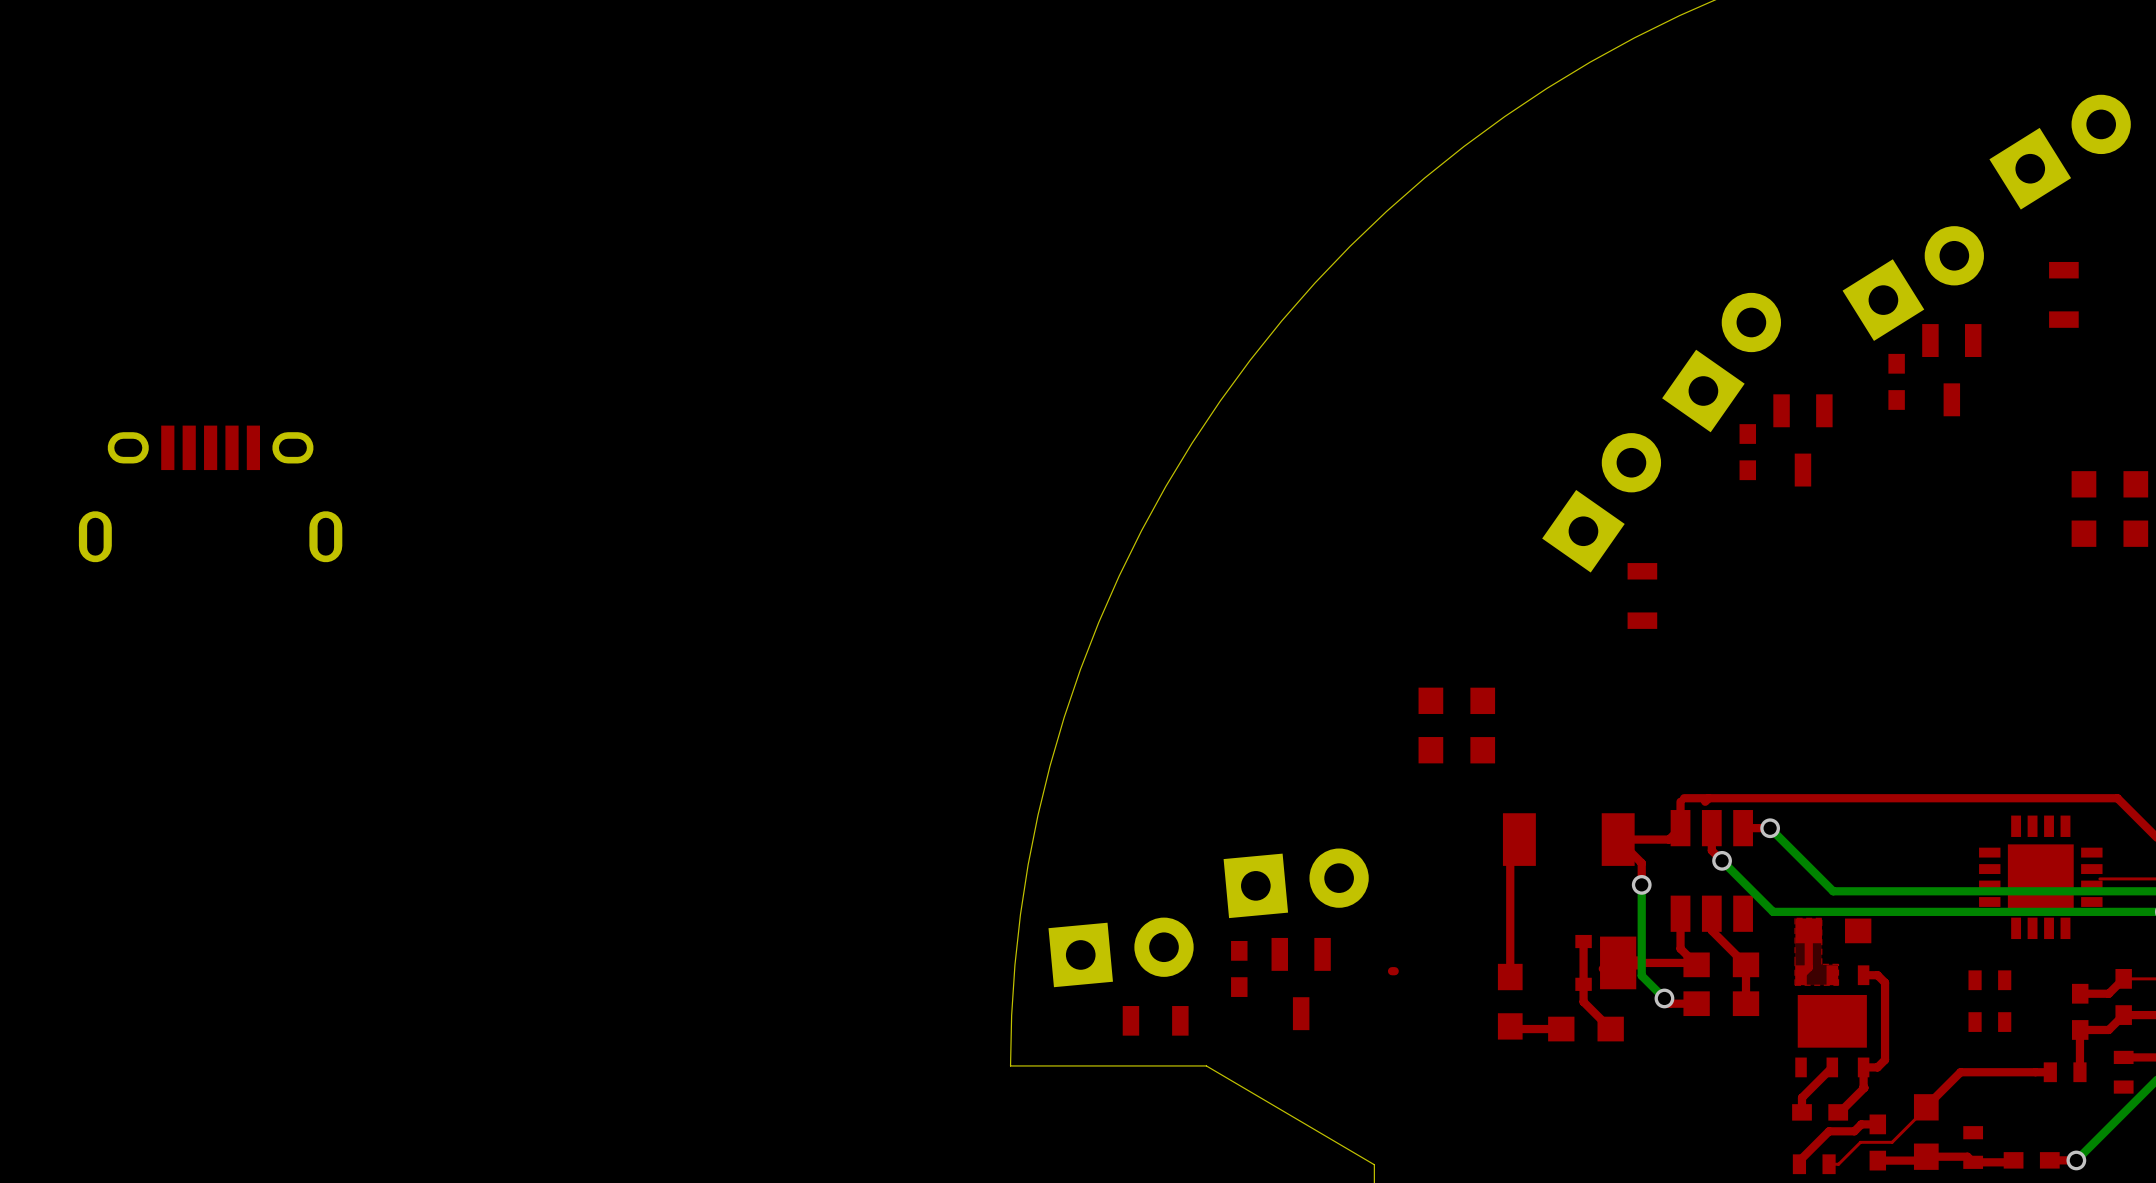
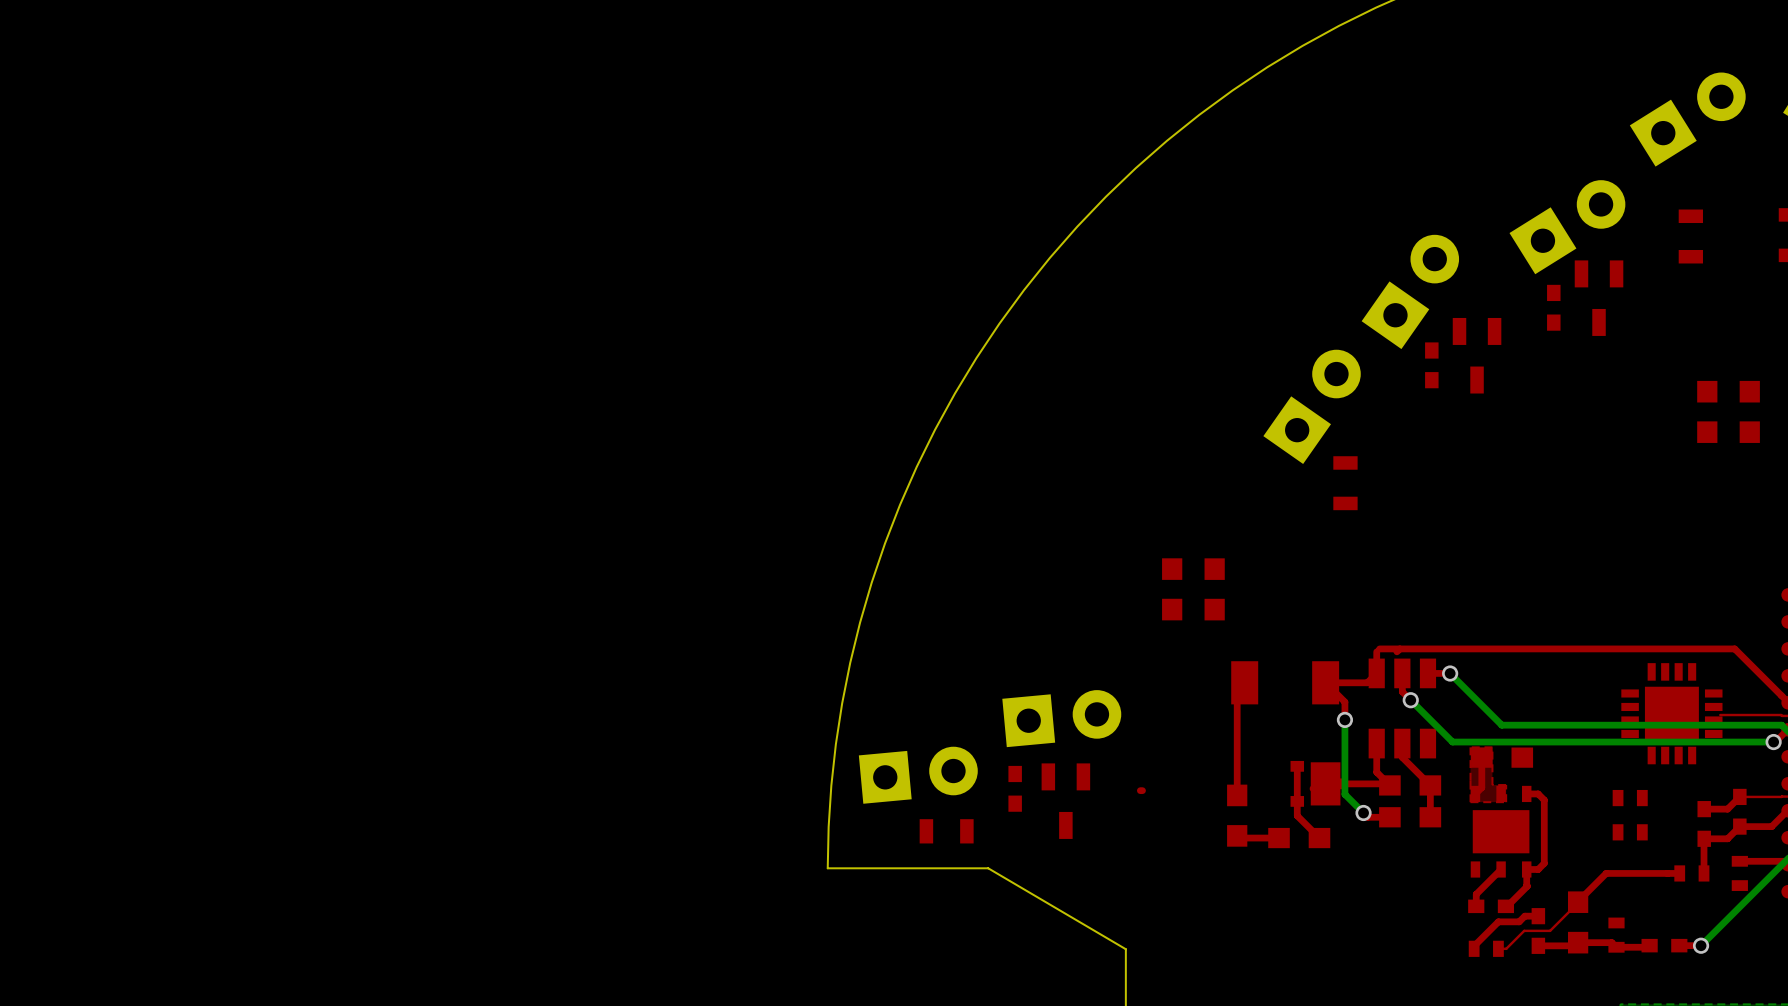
part: (210, 493) -> none

